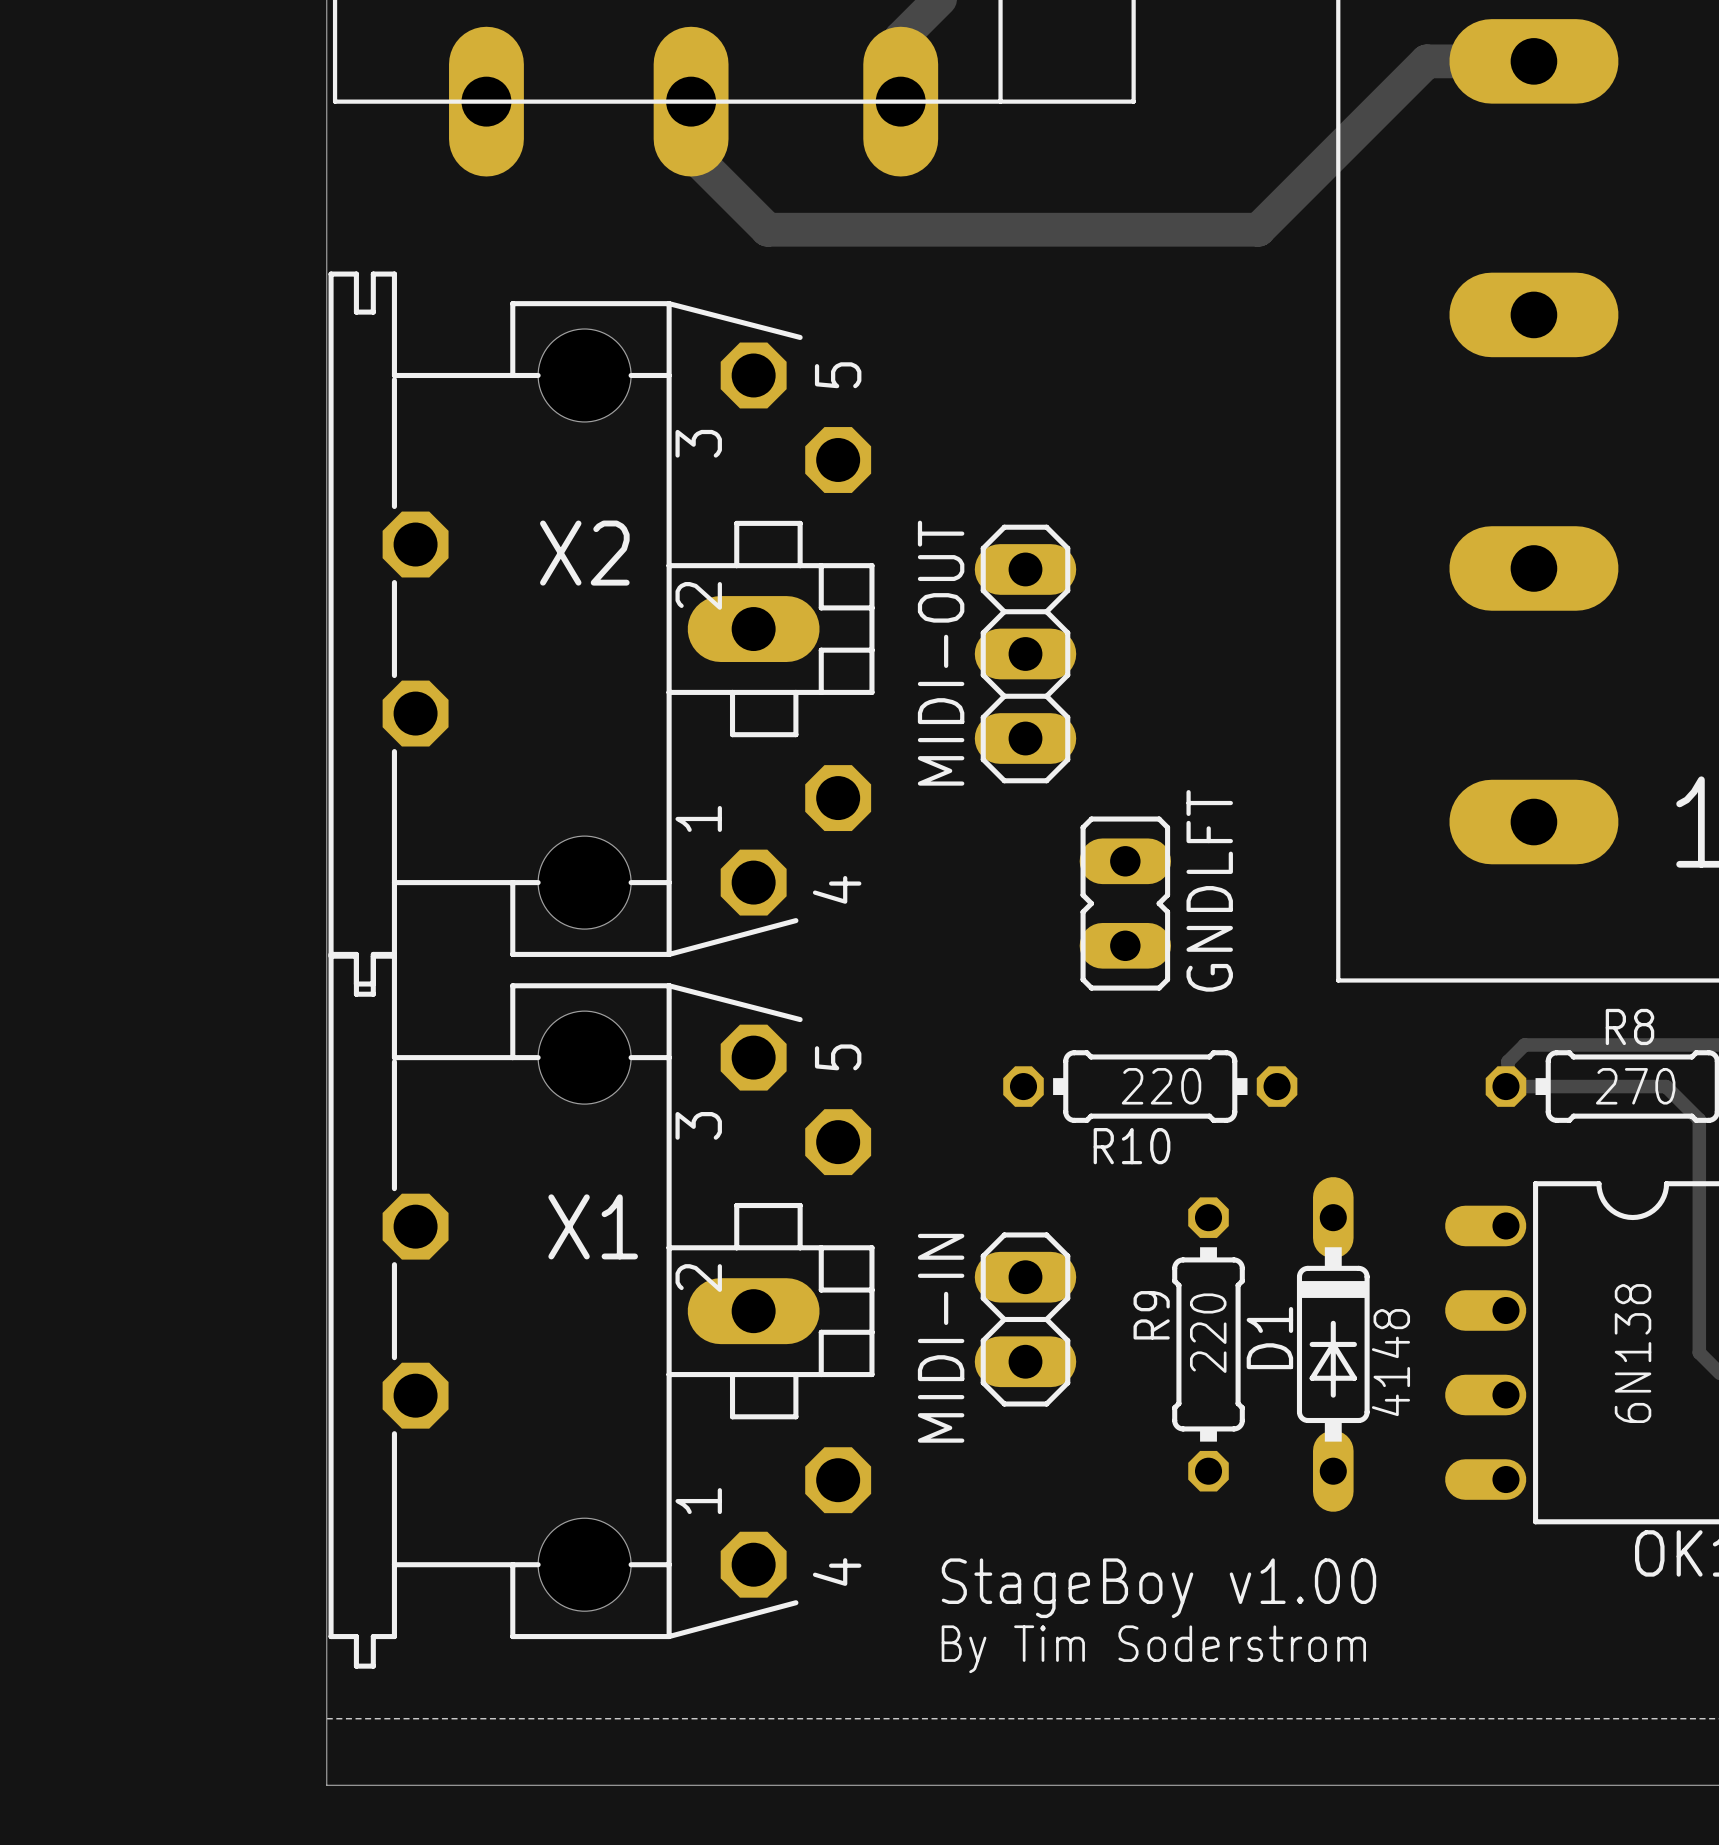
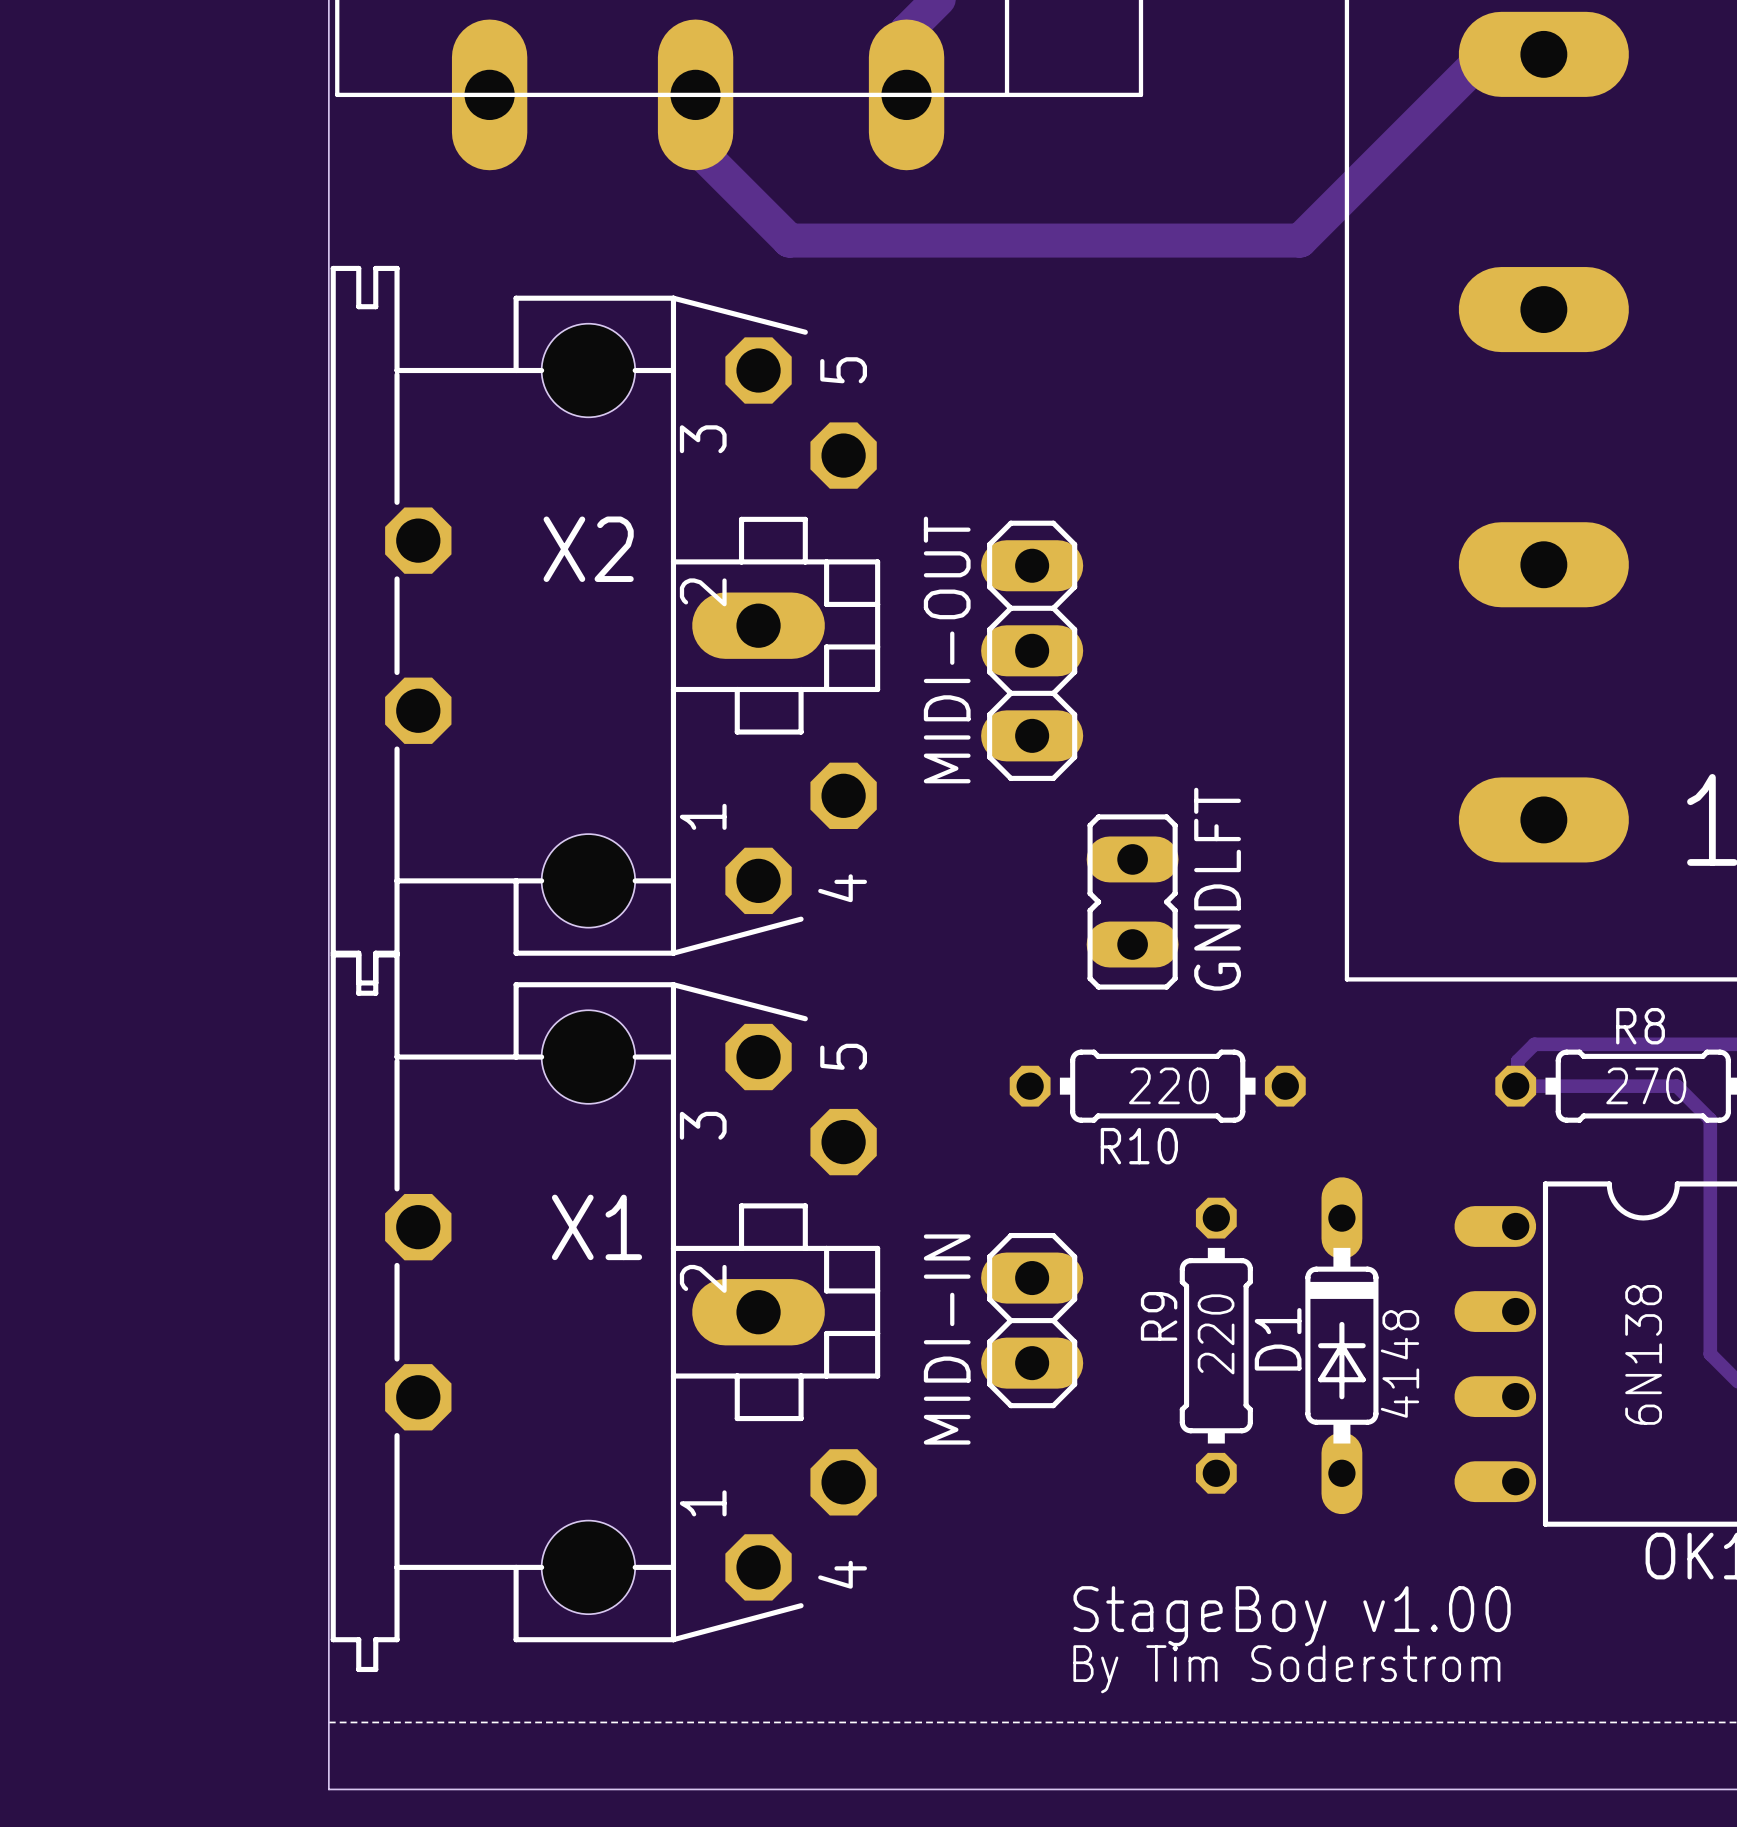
track: (1476, 61) (1426, 61) (1258, 229) (767, 229) -> (1486, 54) (1300, 240) (789, 240) (772, 223)
text position: StageBoy v1.00 (1158, 1588) -> StageBoy v1.00 (1292, 1616)
text position: By Tim Soderstrom (1153, 1649) -> By Tim Soderstrom (1286, 1669)

